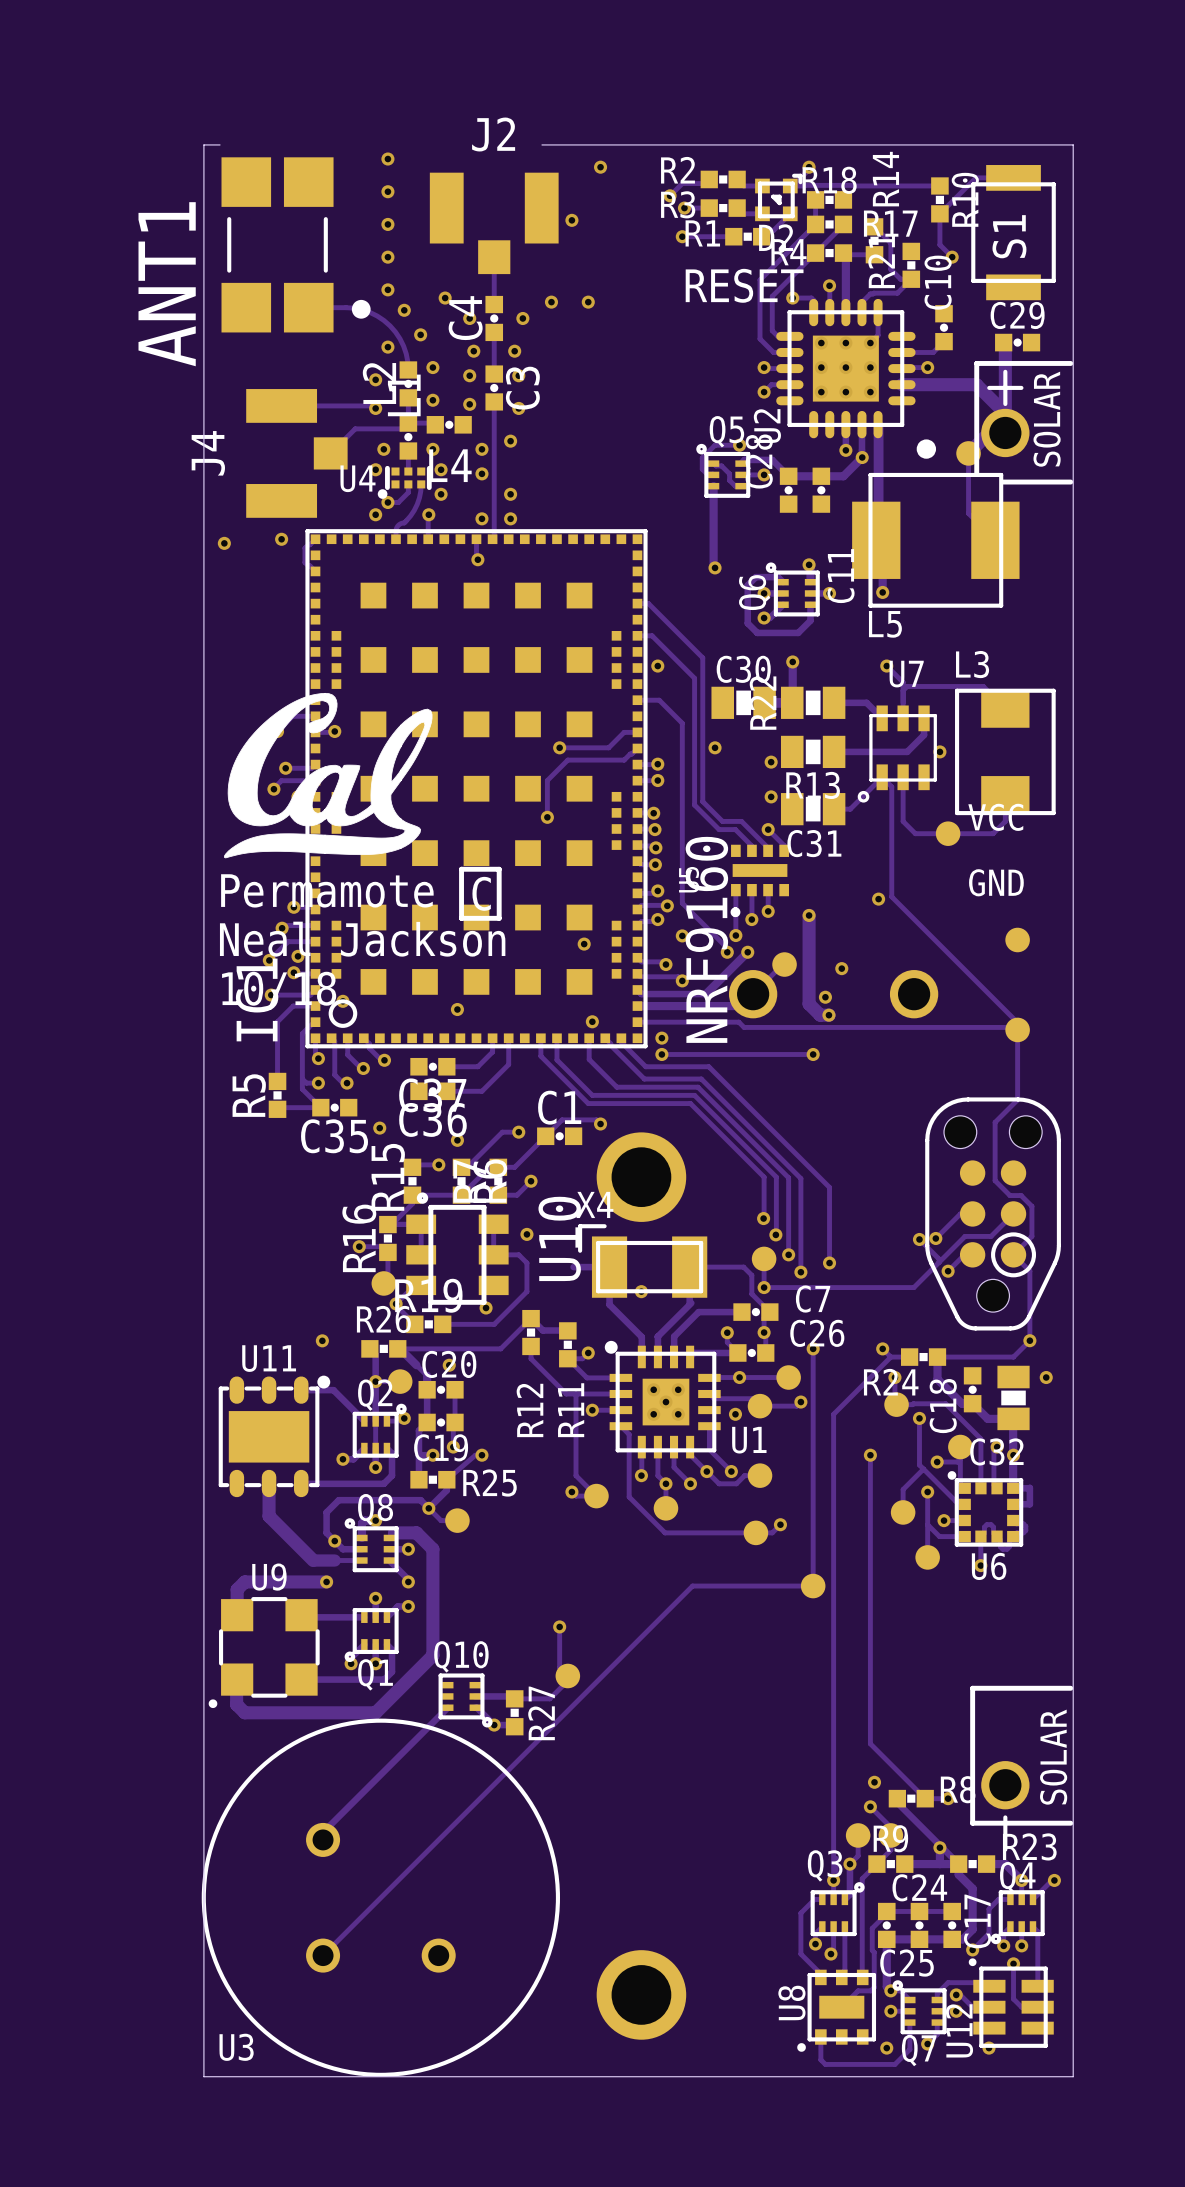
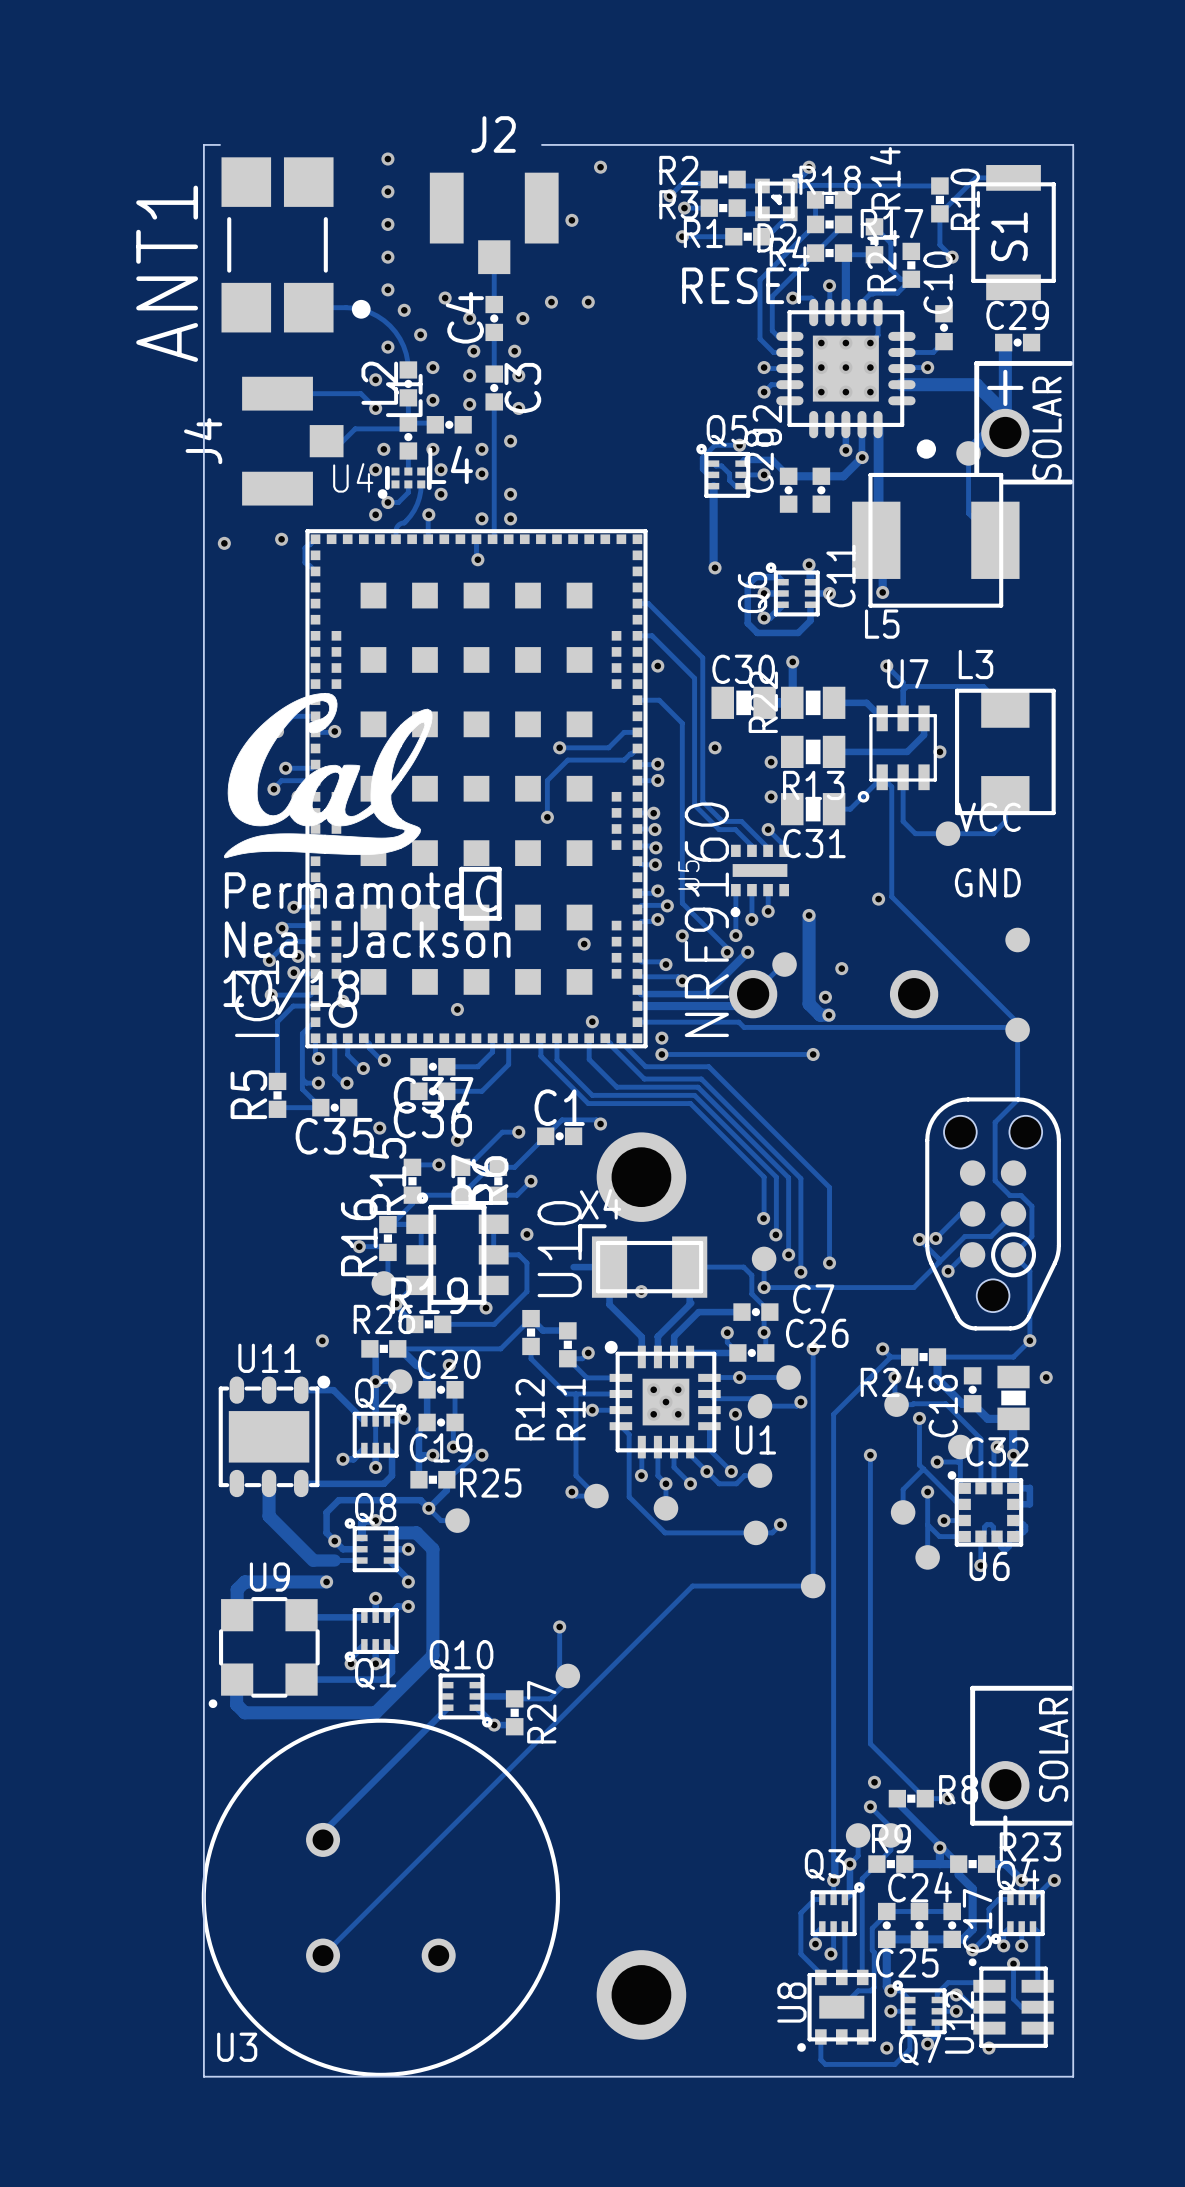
track: (281, 405) (373, 405) -> (277, 393) (360, 393) (373, 405)
J4 position: (296, 453) -> (292, 441)

